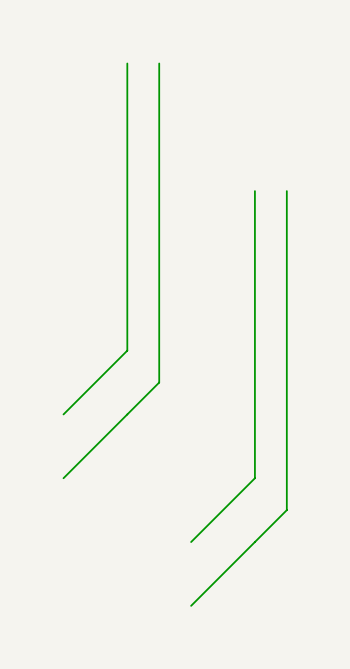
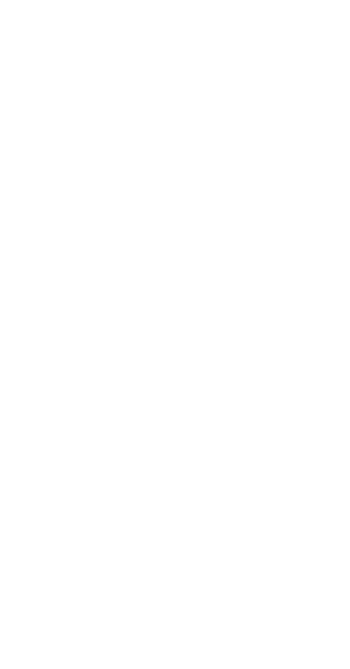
wire: (127, 63) (127, 350) (63, 414) -> none
wire: (159, 63) (159, 382) (63, 478) -> none
wire: (254, 191) (254, 478) (191, 542) -> none
wire: (286, 191) (286, 510) (191, 605) -> none

